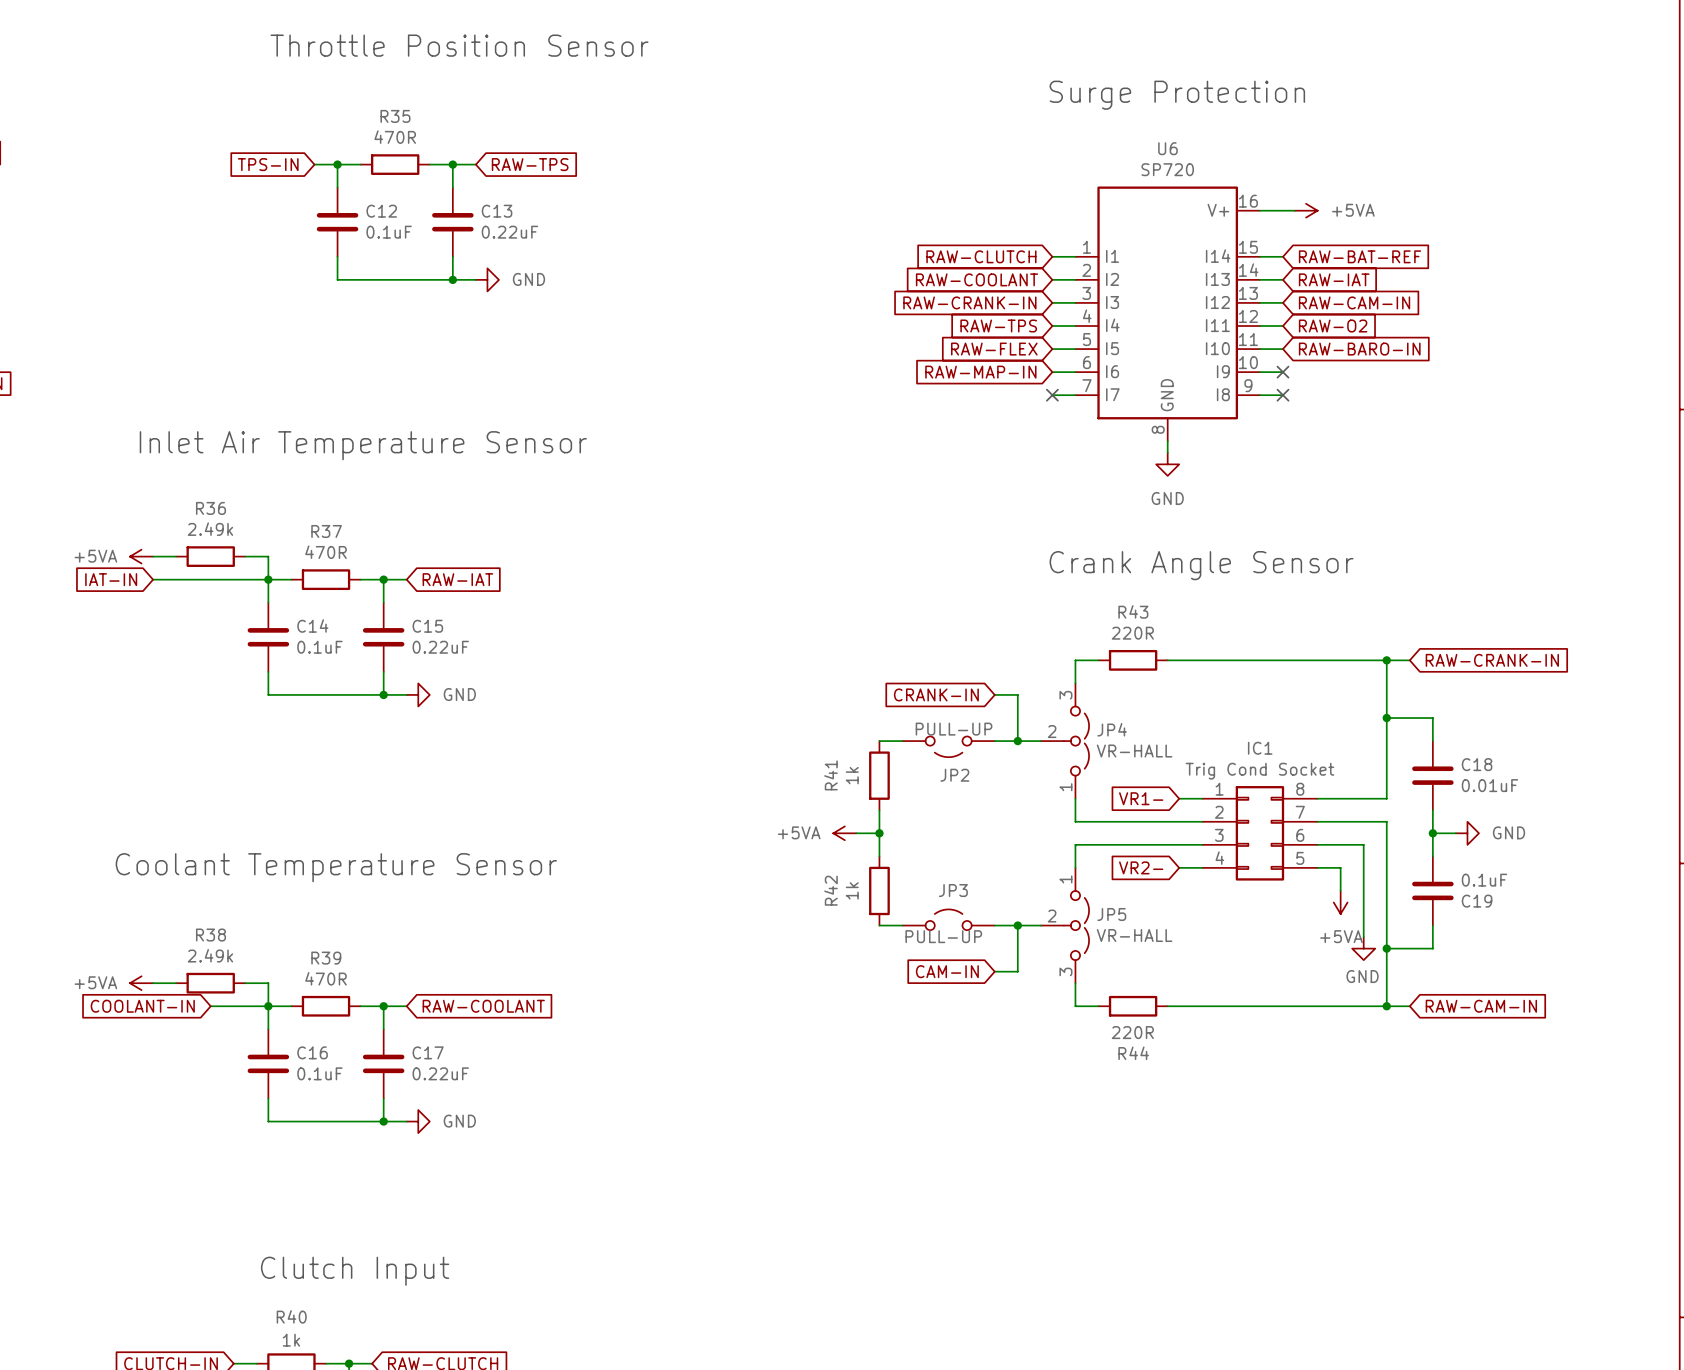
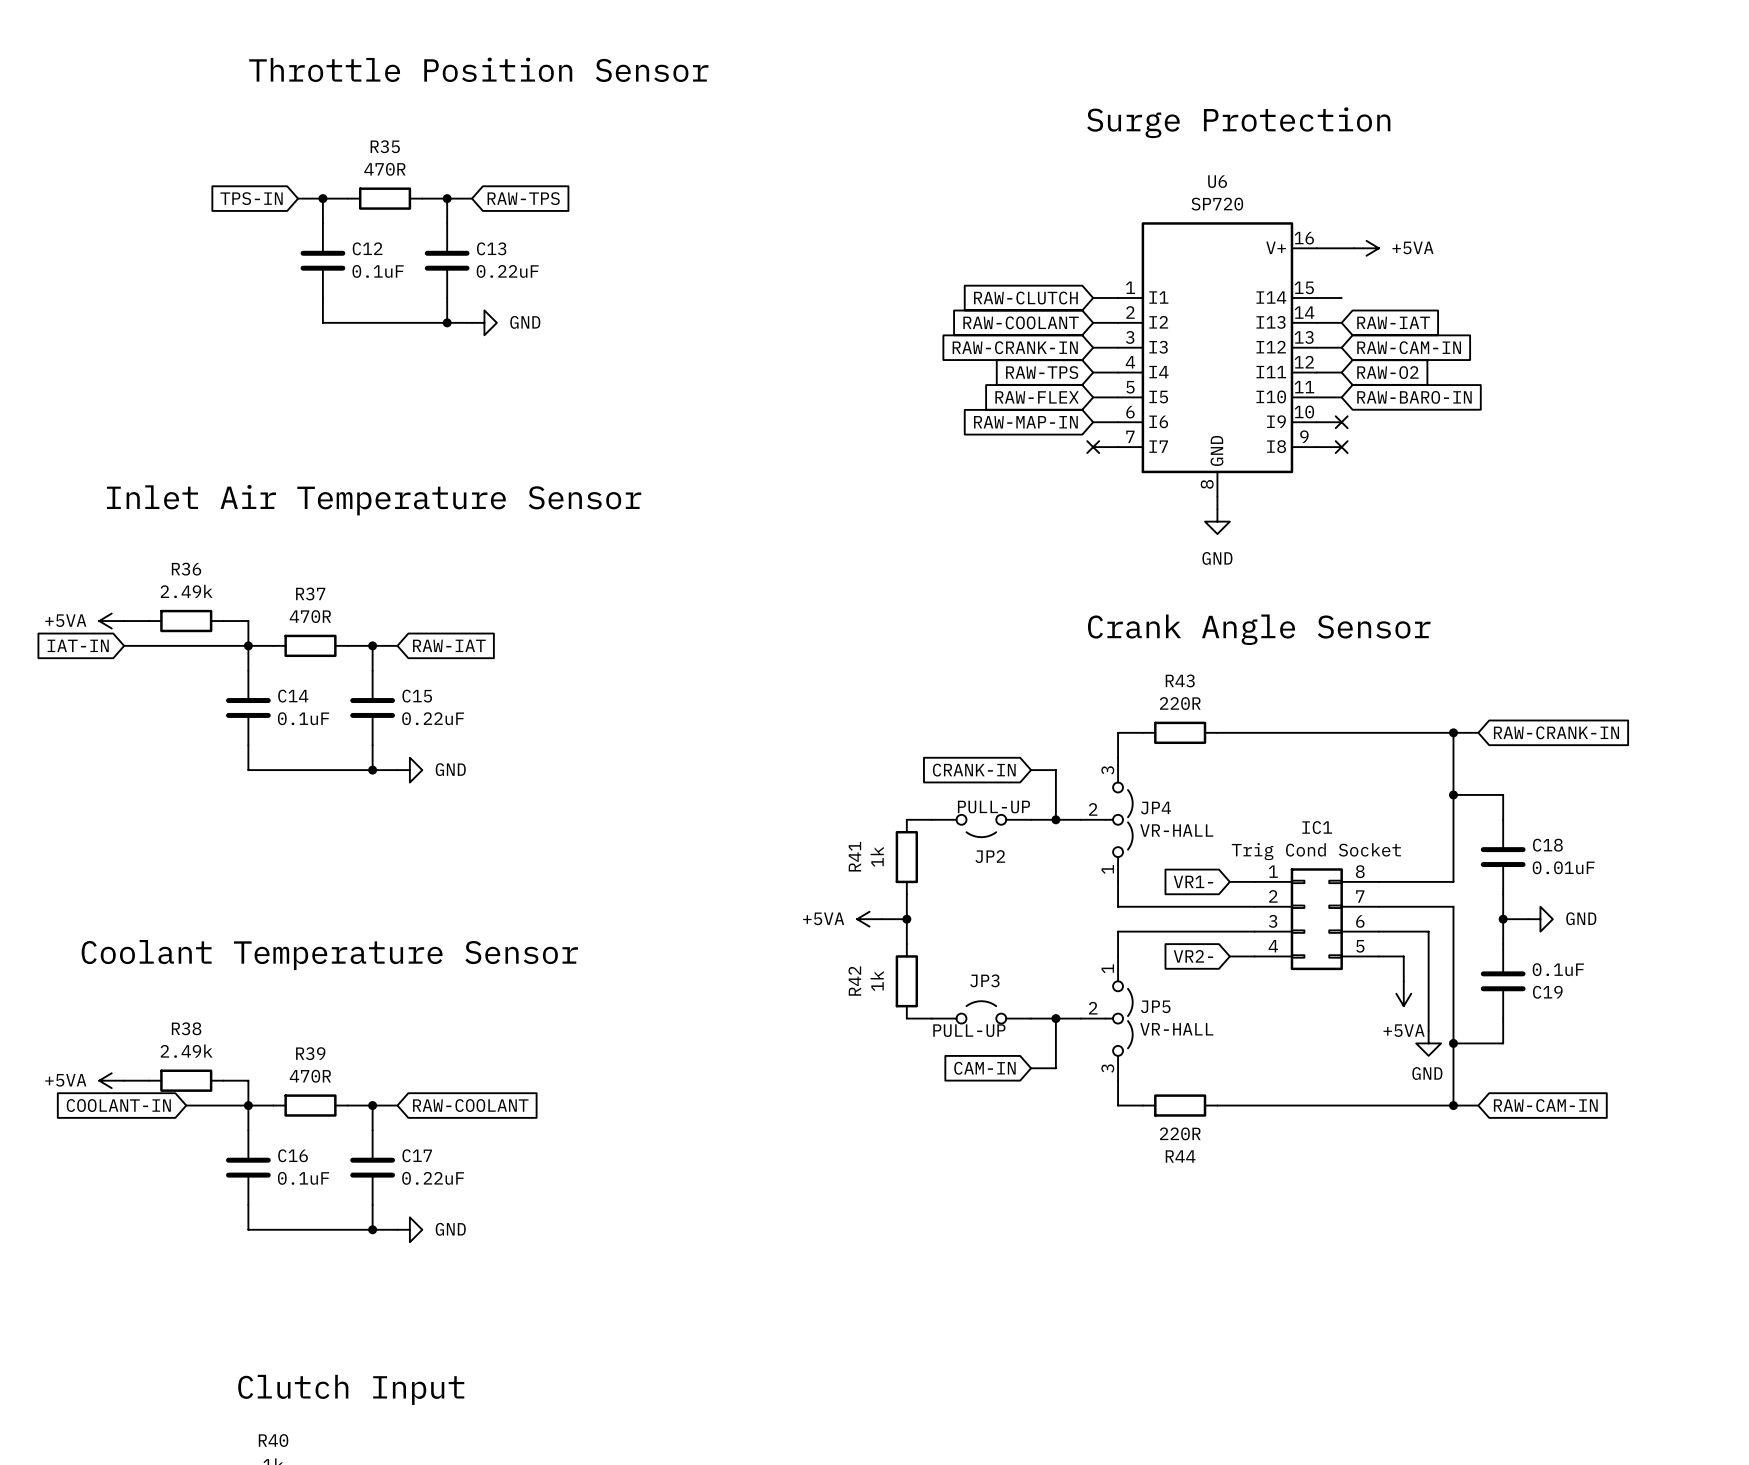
global label: RAW-BAT-REF (1360, 256) -> none

